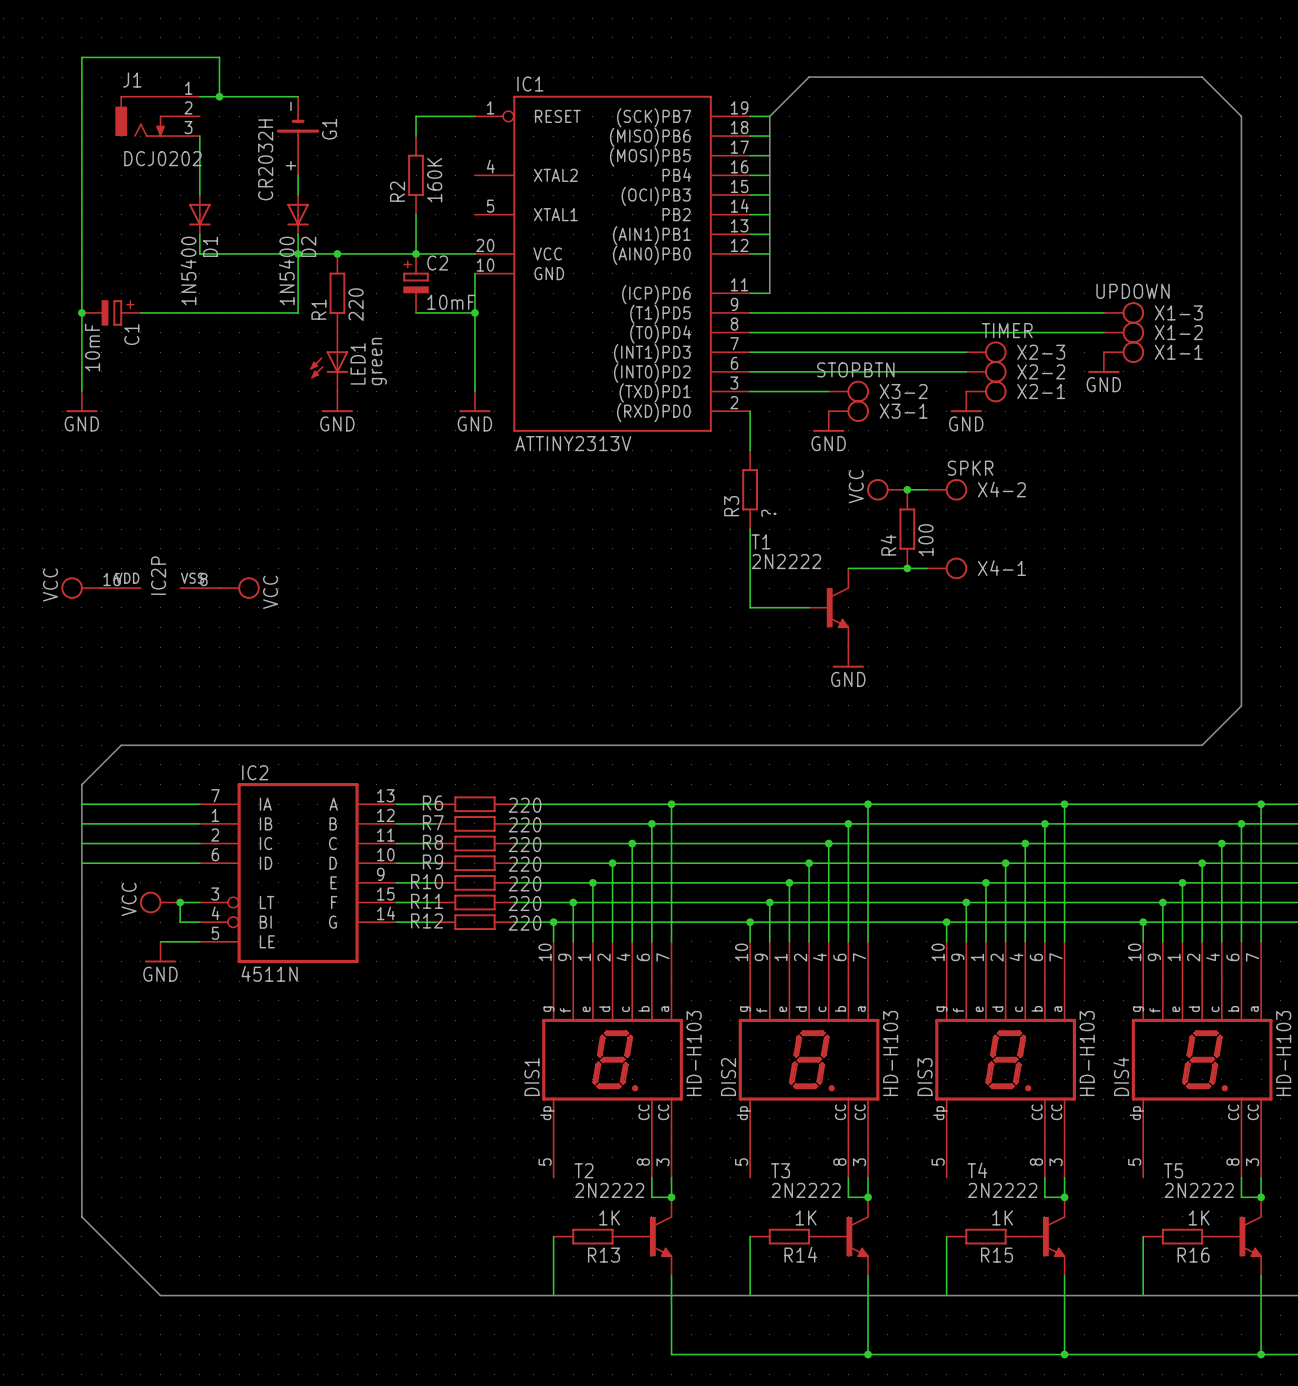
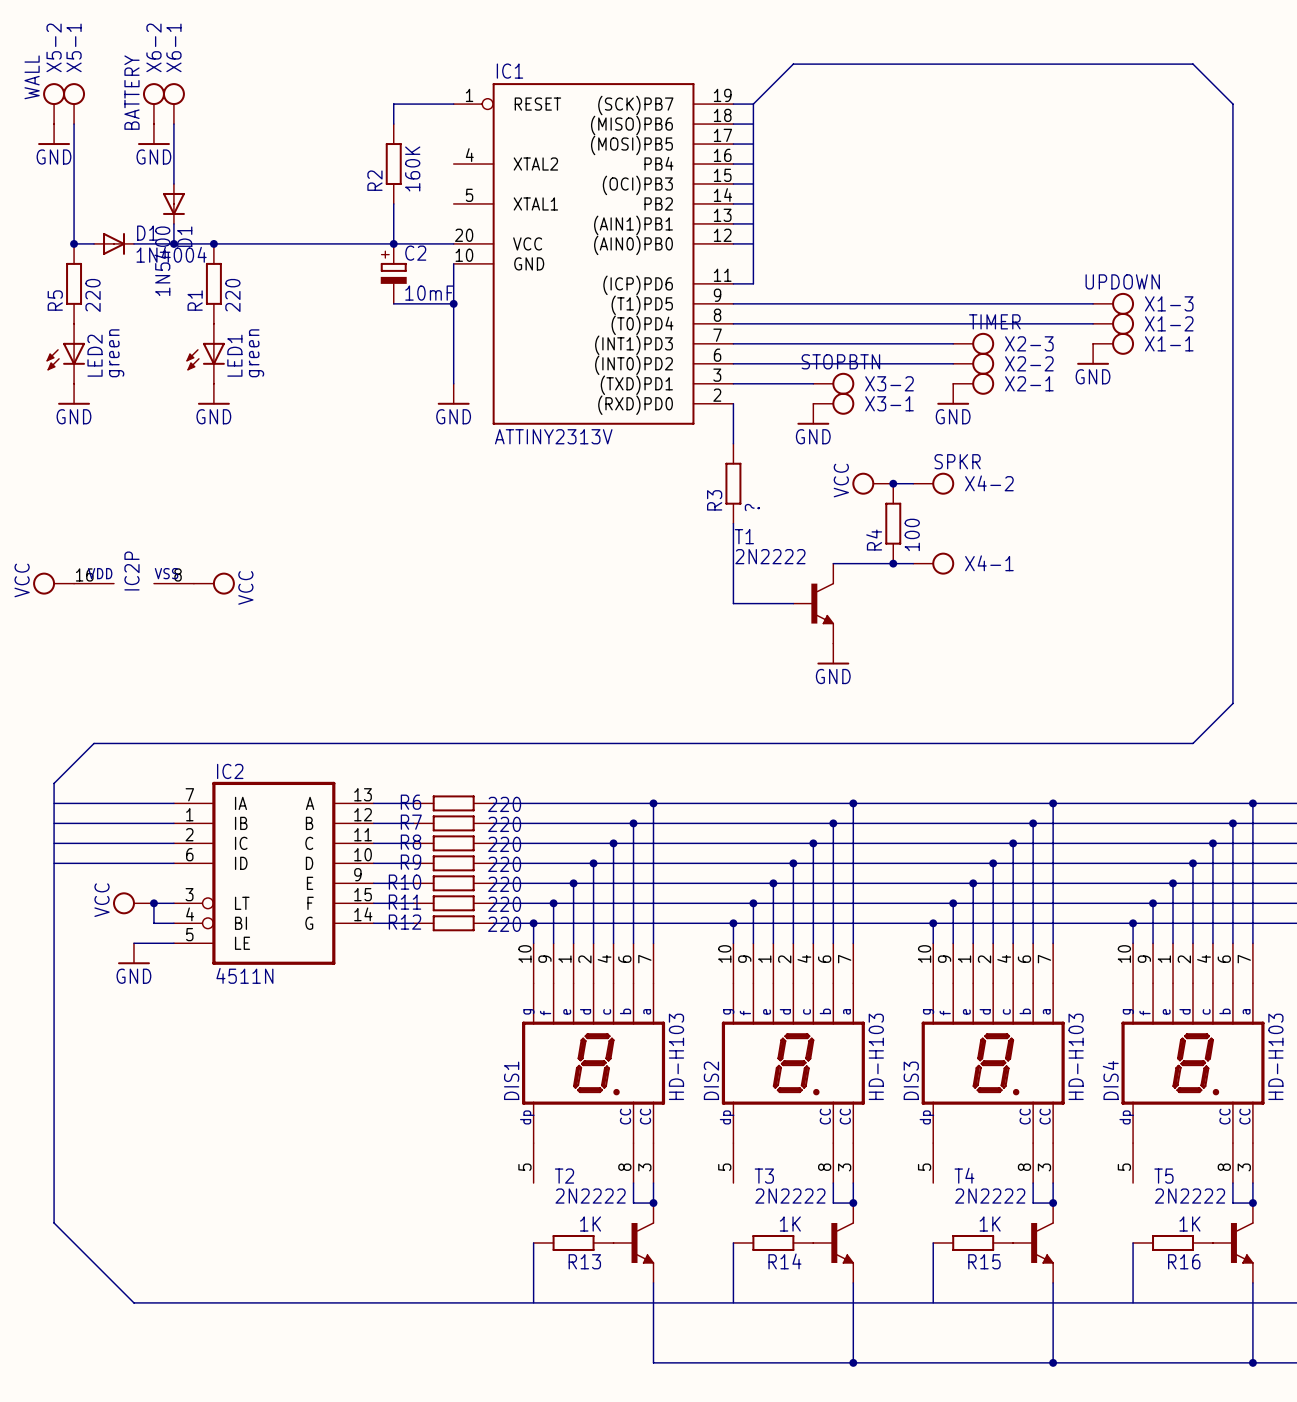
wire: (199, 96) (298, 96) -> none
wire: (219, 96) (219, 57) (81, 57) (81, 391) -> none
junction: (219, 96) -> none
X5-2: none -> WALL (54, 103)
X5-1: none -> (74, 103)
X6-2: none -> BATTERY (153, 103)
X6-1: none -> (173, 103)
J1: DCJ0202 (157, 116) -> none
wire: none -> (74, 124) (74, 243) (94, 243)
G1: CR2032H (298, 136) -> none
power symbol: none -> GND (54, 134)
power symbol: none -> GND (153, 134)
wire: (298, 175) (298, 195) -> none
D2: 1N5400 (298, 214) -> none
wire: (298, 234) (298, 312) (140, 312) -> none
junction: none -> (74, 243)
D1: none -> 1N4004 (114, 243)
wire: none -> (133, 243) (173, 243)
junction: none -> (173, 243)
junction: none -> (213, 243)
junction: (298, 253) -> none
junction: (337, 253) -> none
R5: none -> 220 (74, 283)
R1 position: (337, 293) -> (213, 283)
junction: (81, 312) -> none
C1: 10mF (111, 312) -> none
LED2: none -> green (65, 353)
LED1 position: (329, 362) -> (205, 353)
power symbol position: GND (81, 401) -> GND (74, 394)
power symbol: none -> GND (213, 394)
power symbol: GND (337, 401) -> none

